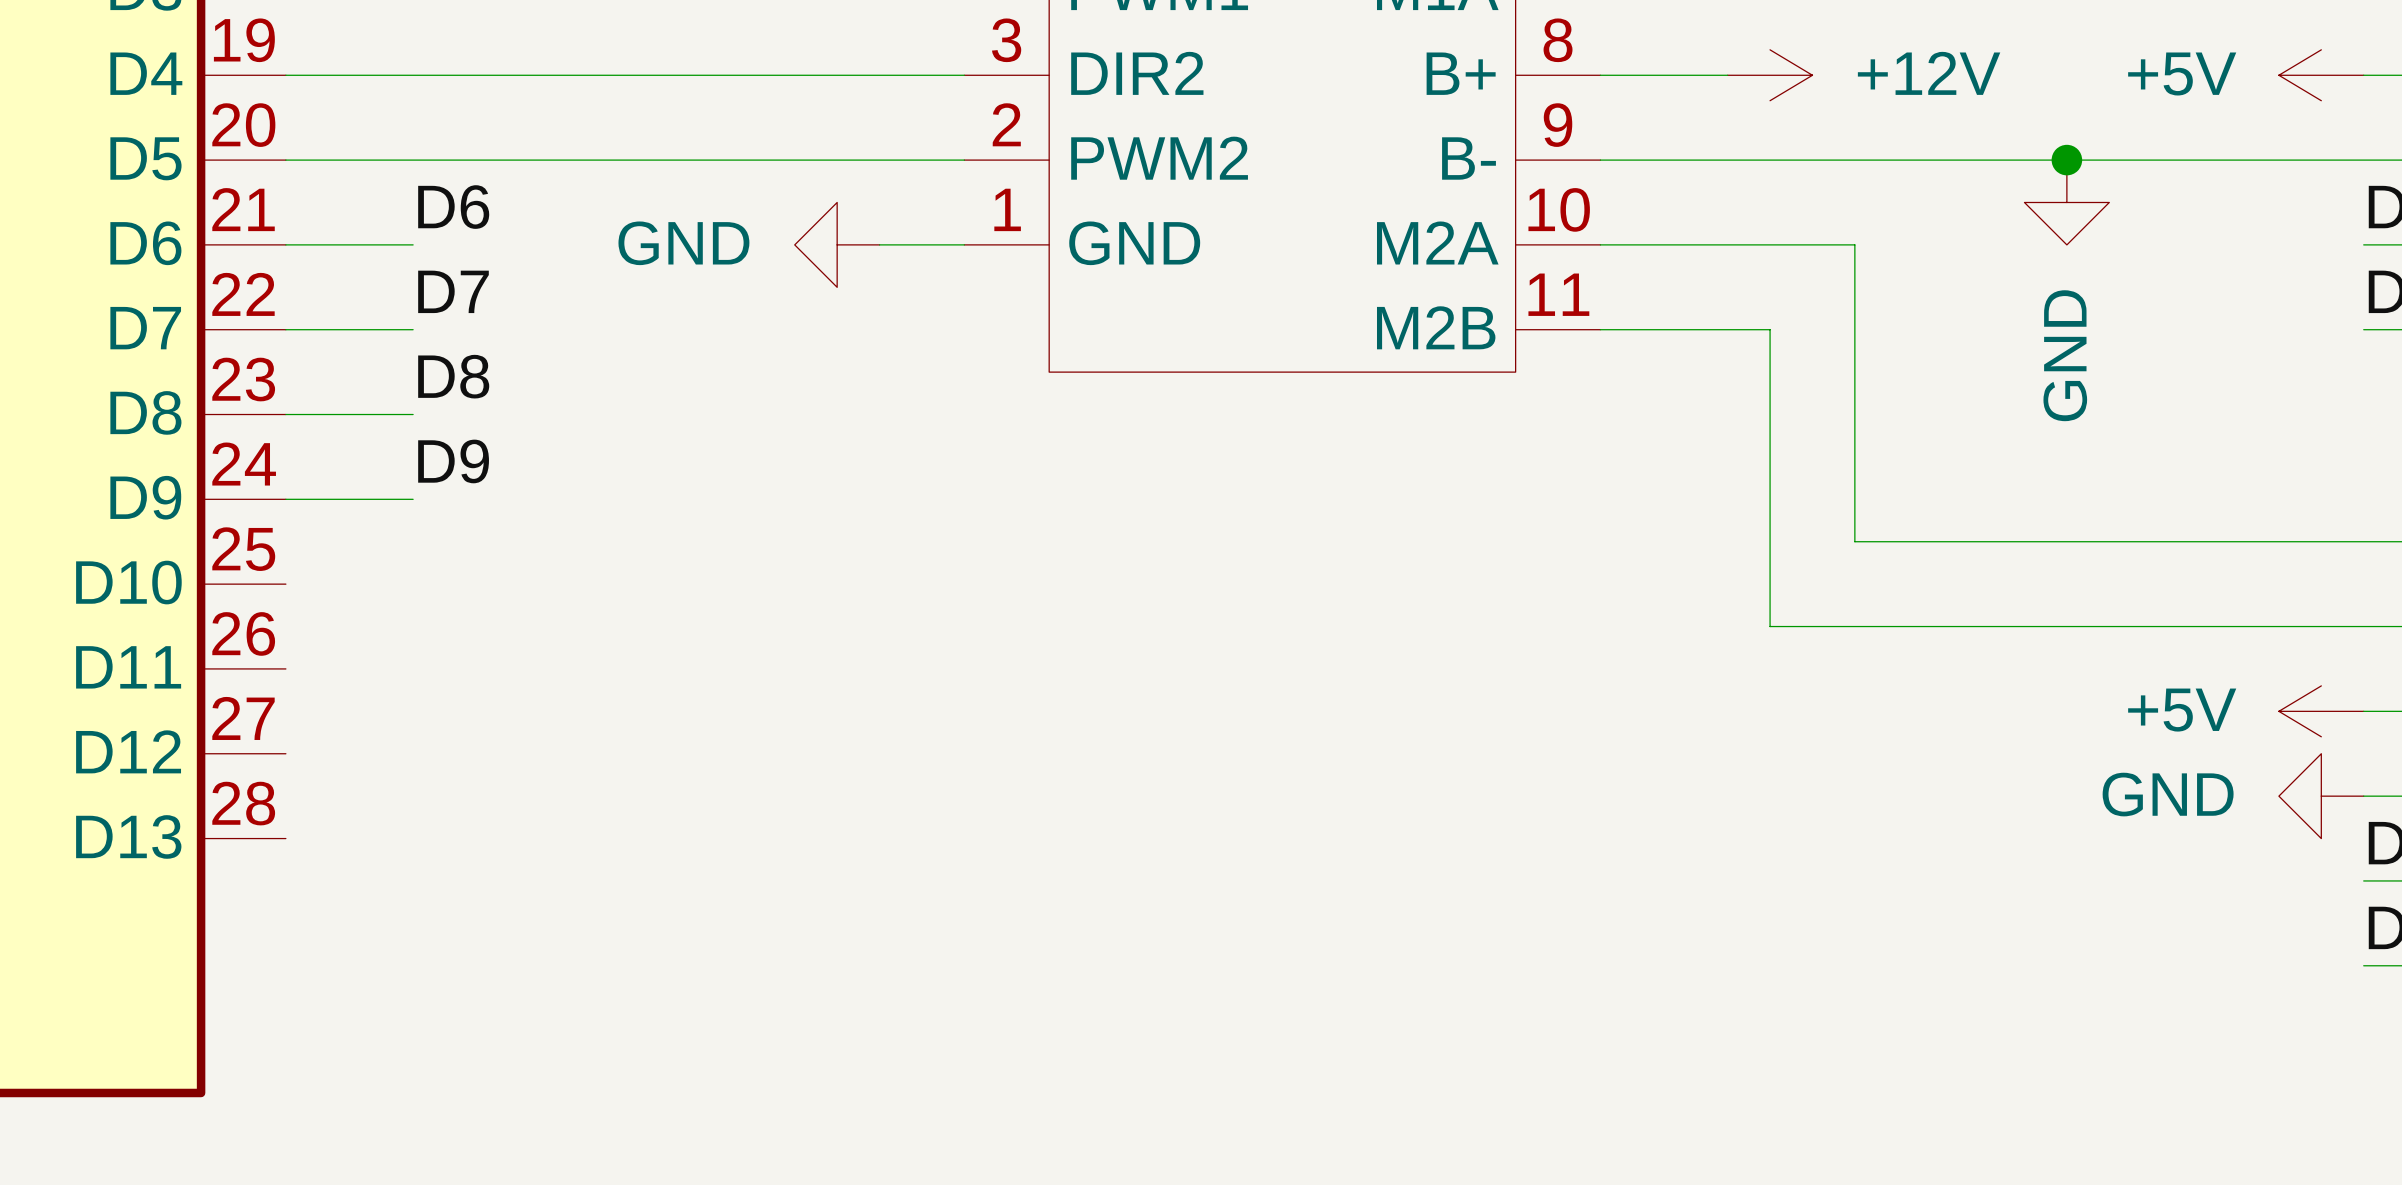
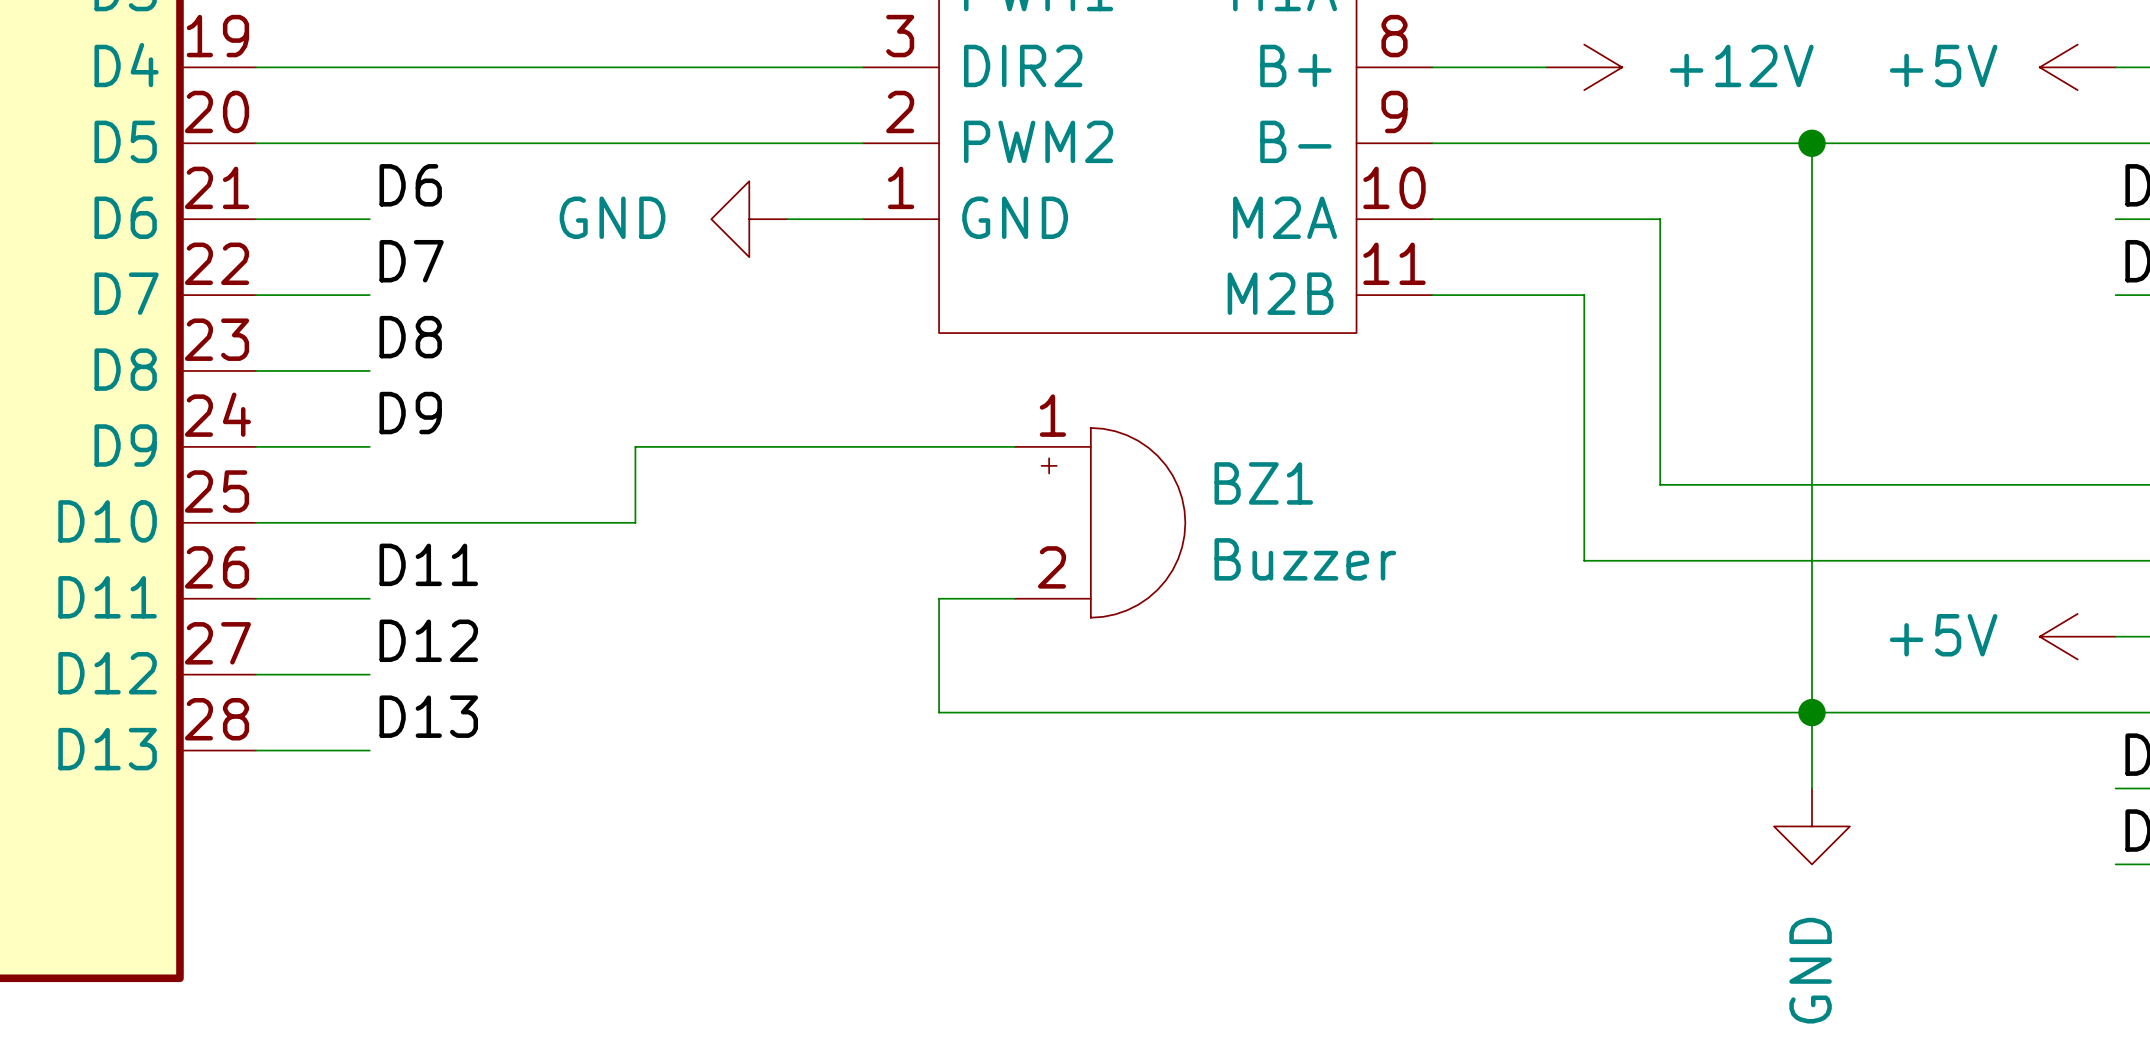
wire: none -> (1811, 143) (1811, 788)
junction position: (2066, 160) -> (1811, 143)
power symbol: GND (2066, 202) -> none
wire: none -> (1014, 446) (635, 446) (635, 522) (255, 522)
BZ1: none -> Buzzer (1100, 522)
label: none -> D11 (428, 564)
wire: none -> (255, 598) (369, 598)
wire: none -> (1014, 598) (939, 598) (939, 712) (2115, 712)
label: none -> D12 (428, 640)
wire: none -> (255, 674) (369, 674)
junction: none -> (1811, 712)
power symbol rotation: 0° (2321, 796) -> 90° counterclockwise (1811, 826)
power symbol position: GND (2321, 796) -> GND (1811, 826)
label: none -> D13 (428, 716)
wire: none -> (255, 750) (369, 750)

